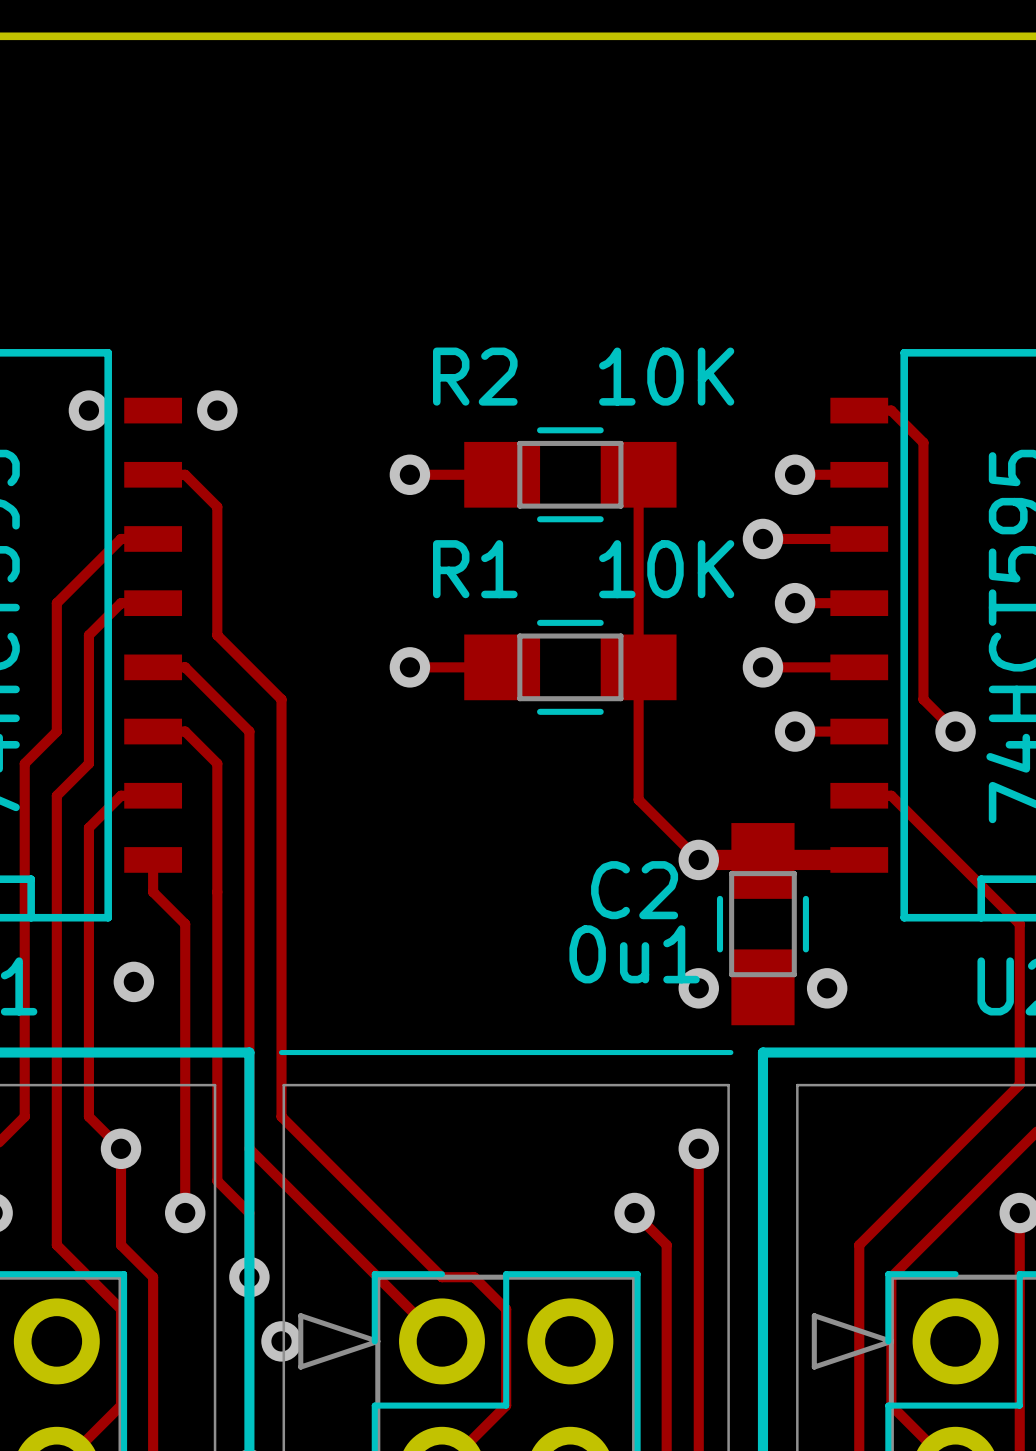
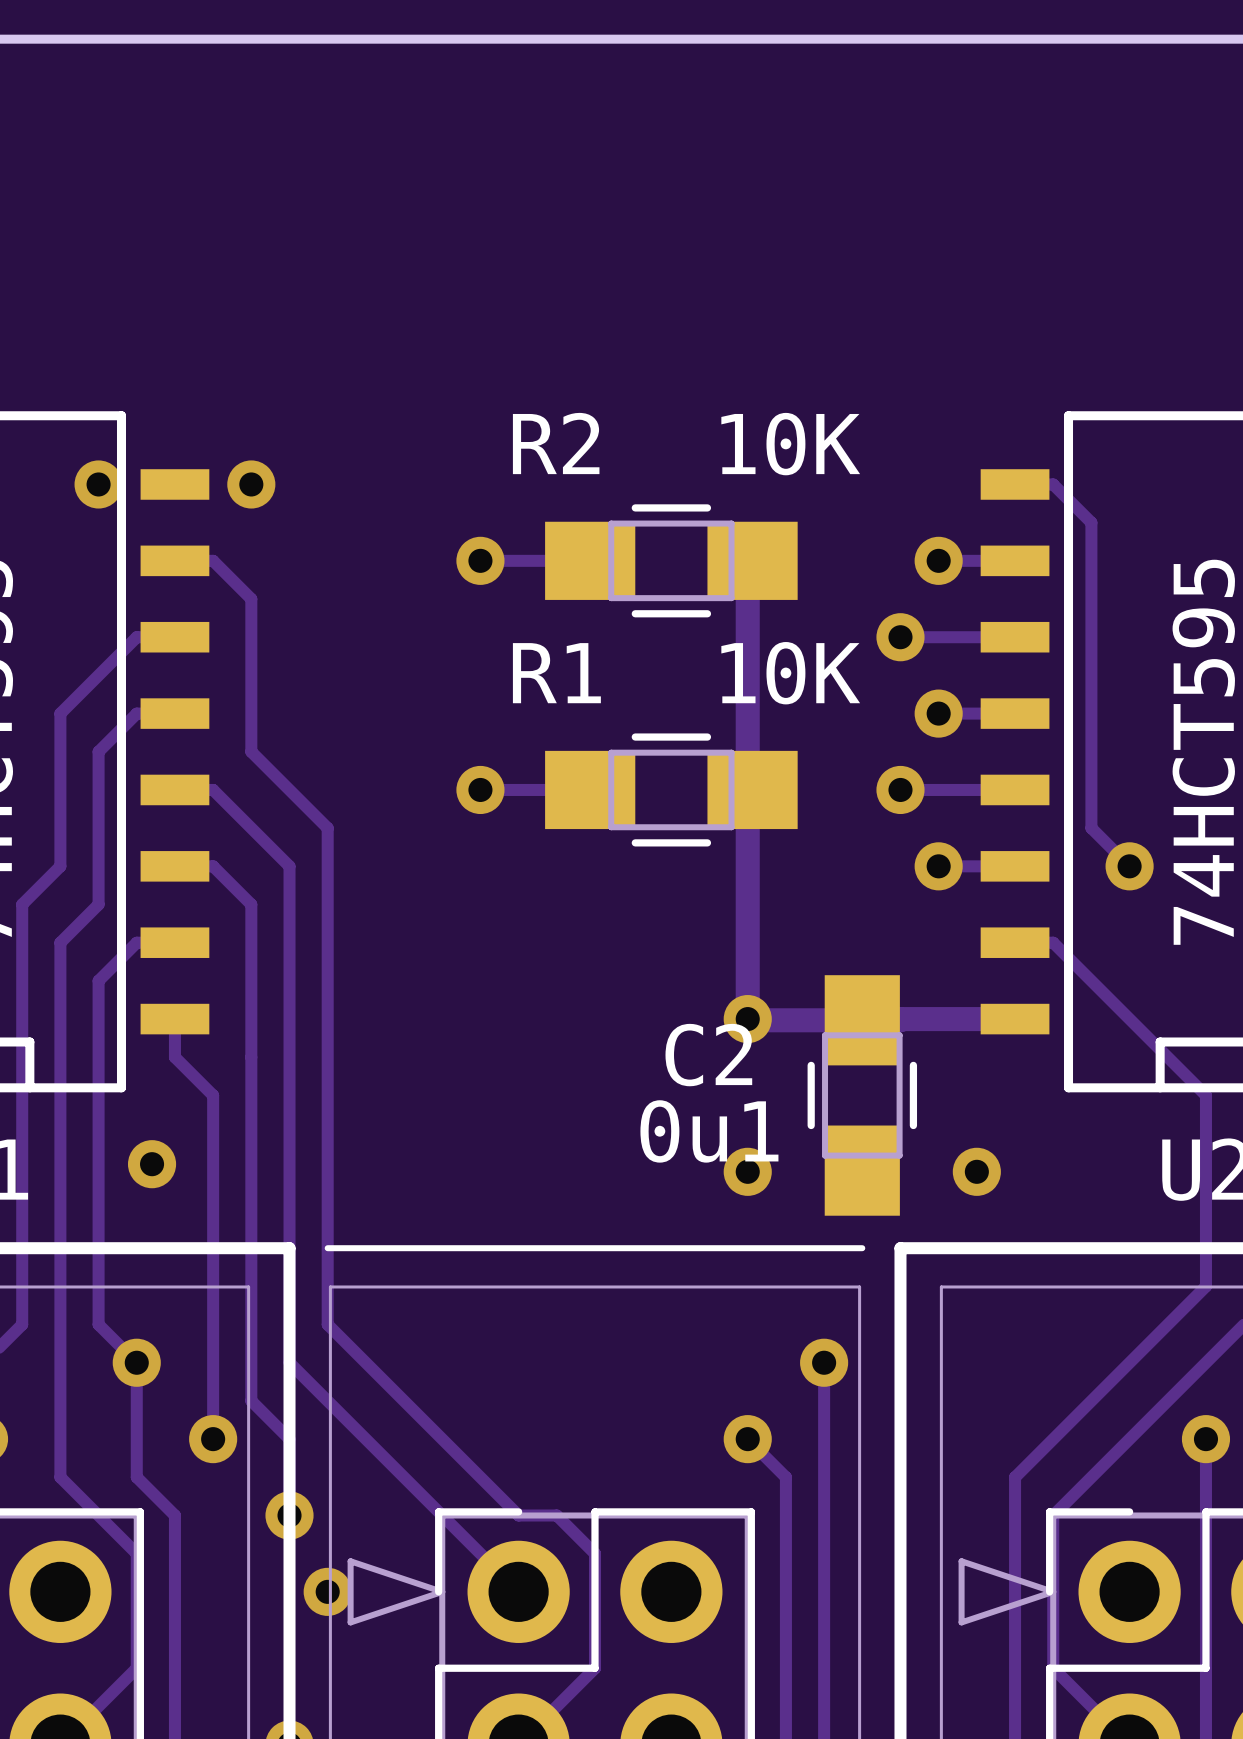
track: (638, 474) (638, 799) (698, 859) (728, 859) -> (752, 560) (747, 565) (747, 1019) (862, 1020)
via position: (698, 859) -> (747, 1019)
C2 position: (762, 924) -> (862, 1095)
via position: (698, 988) -> (747, 1171)

